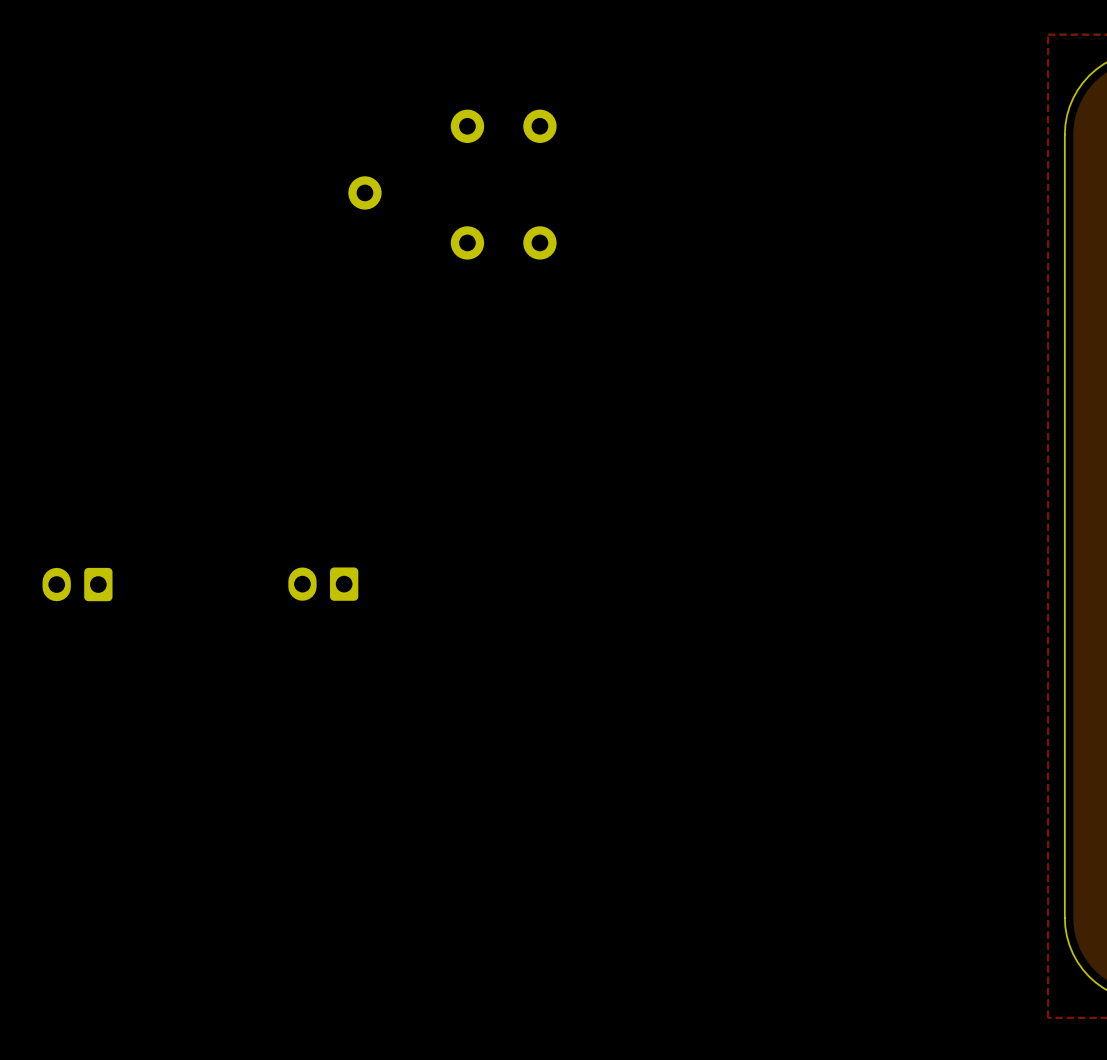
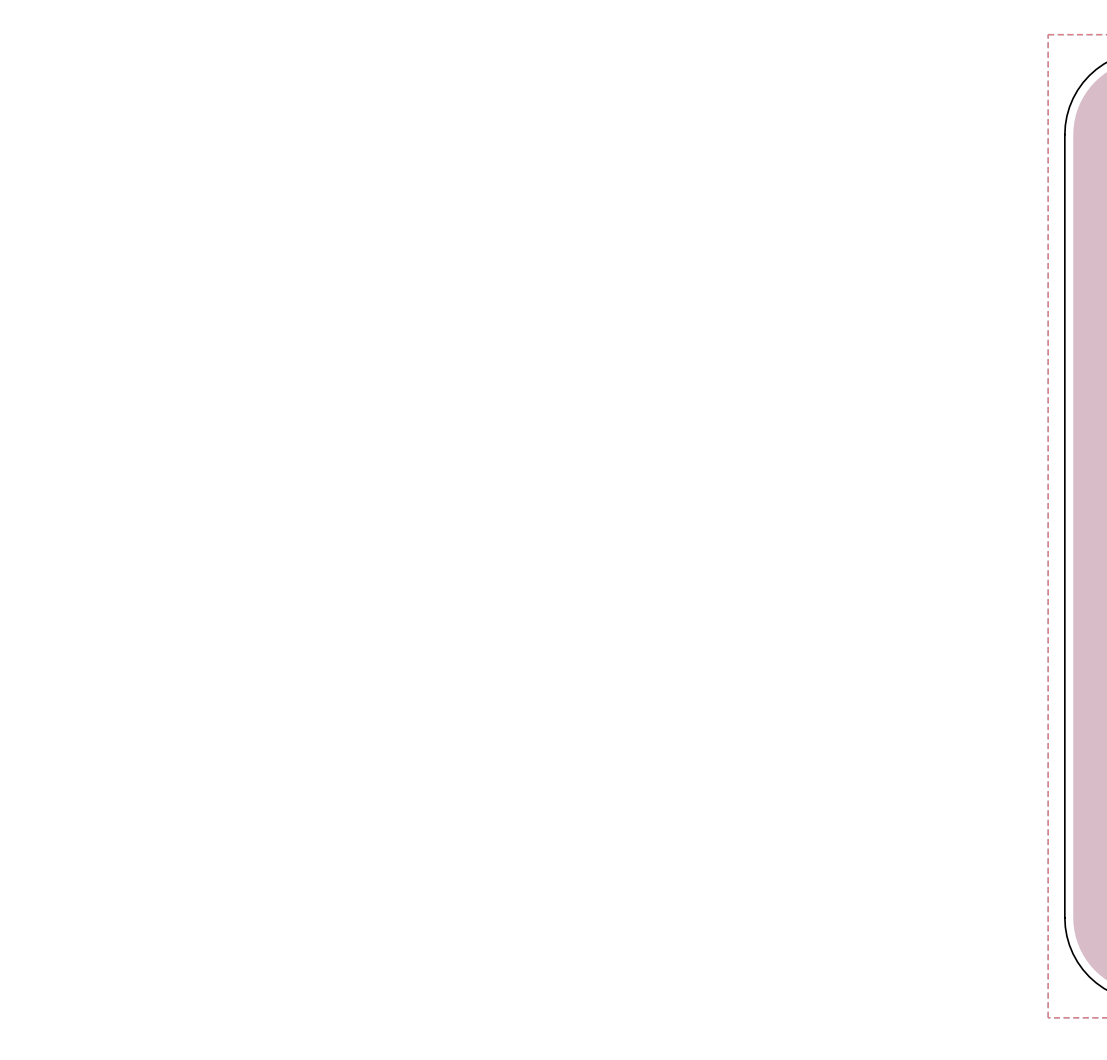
part: (467, 126) -> none
part: (539, 126) -> none
part: (364, 192) -> none
part: (467, 242) -> none
part: (539, 242) -> none
part: (77, 584) -> none
part: (323, 584) -> none

